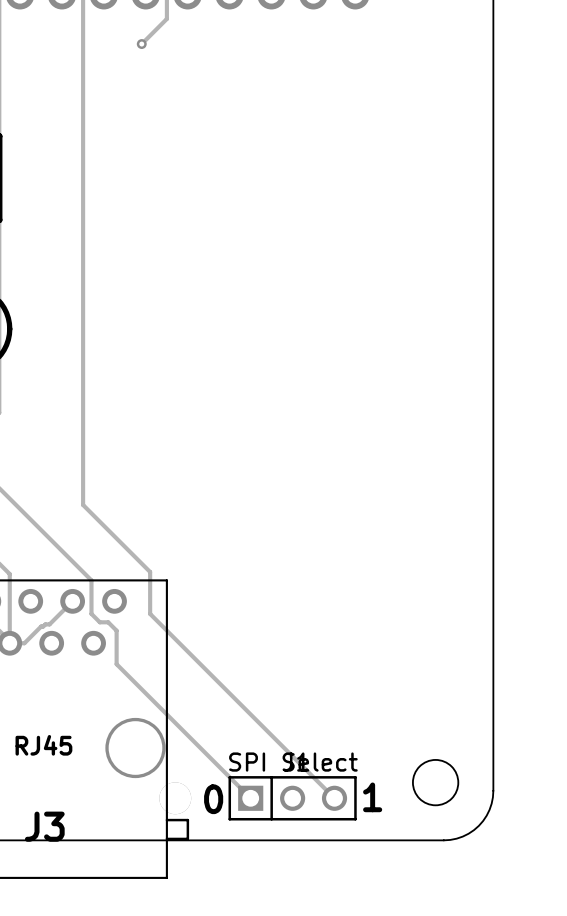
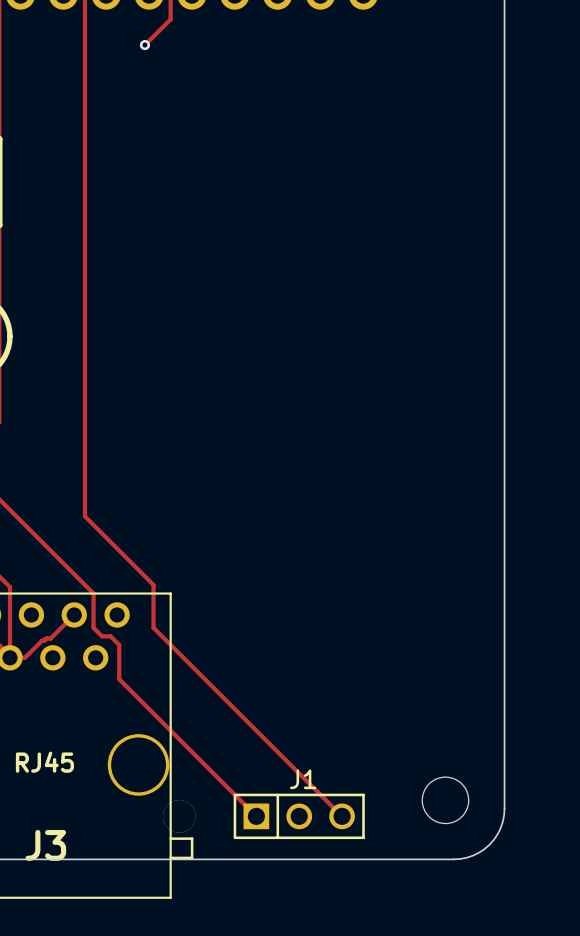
J1 value: SPI Select (293, 762) -> none
text: 1 (372, 797) -> none
text: 0 (213, 799) -> none

